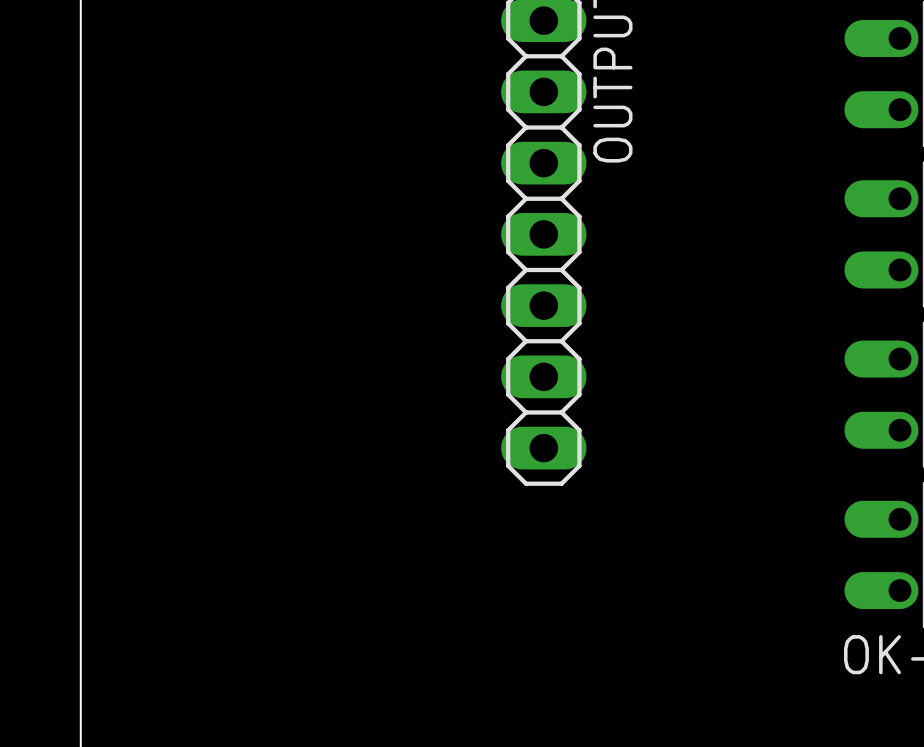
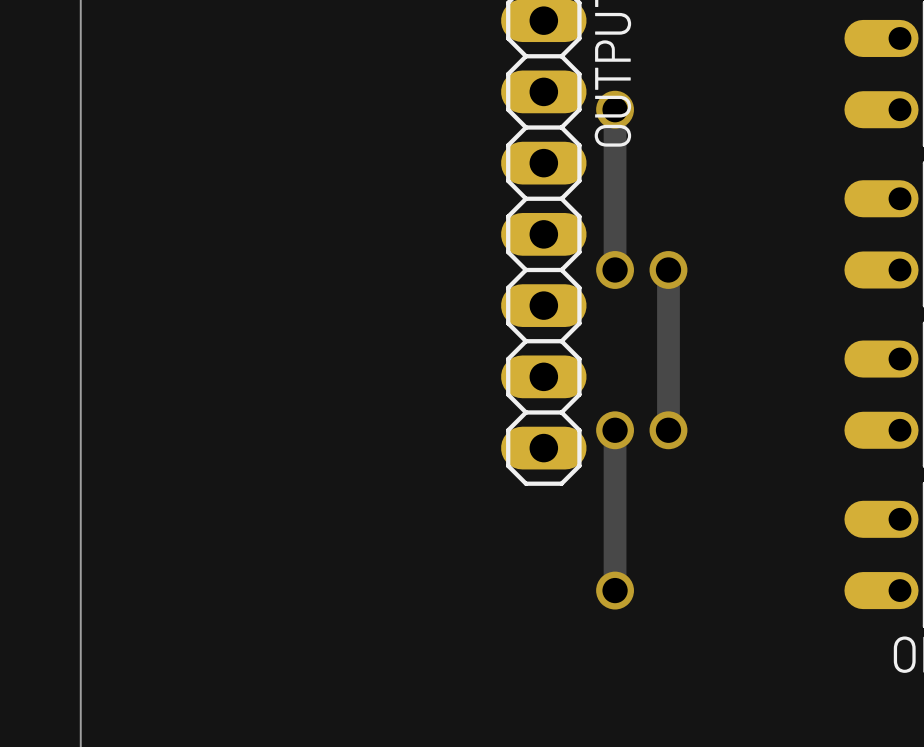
track: none -> (615, 109) (615, 269)
via: none -> (615, 109)
via: none -> (615, 269)
track: none -> (668, 269) (668, 430)
via: none -> (668, 269)
track: none -> (615, 430) (615, 590)
via: none -> (615, 430)
via: none -> (668, 430)
via: none -> (615, 590)

